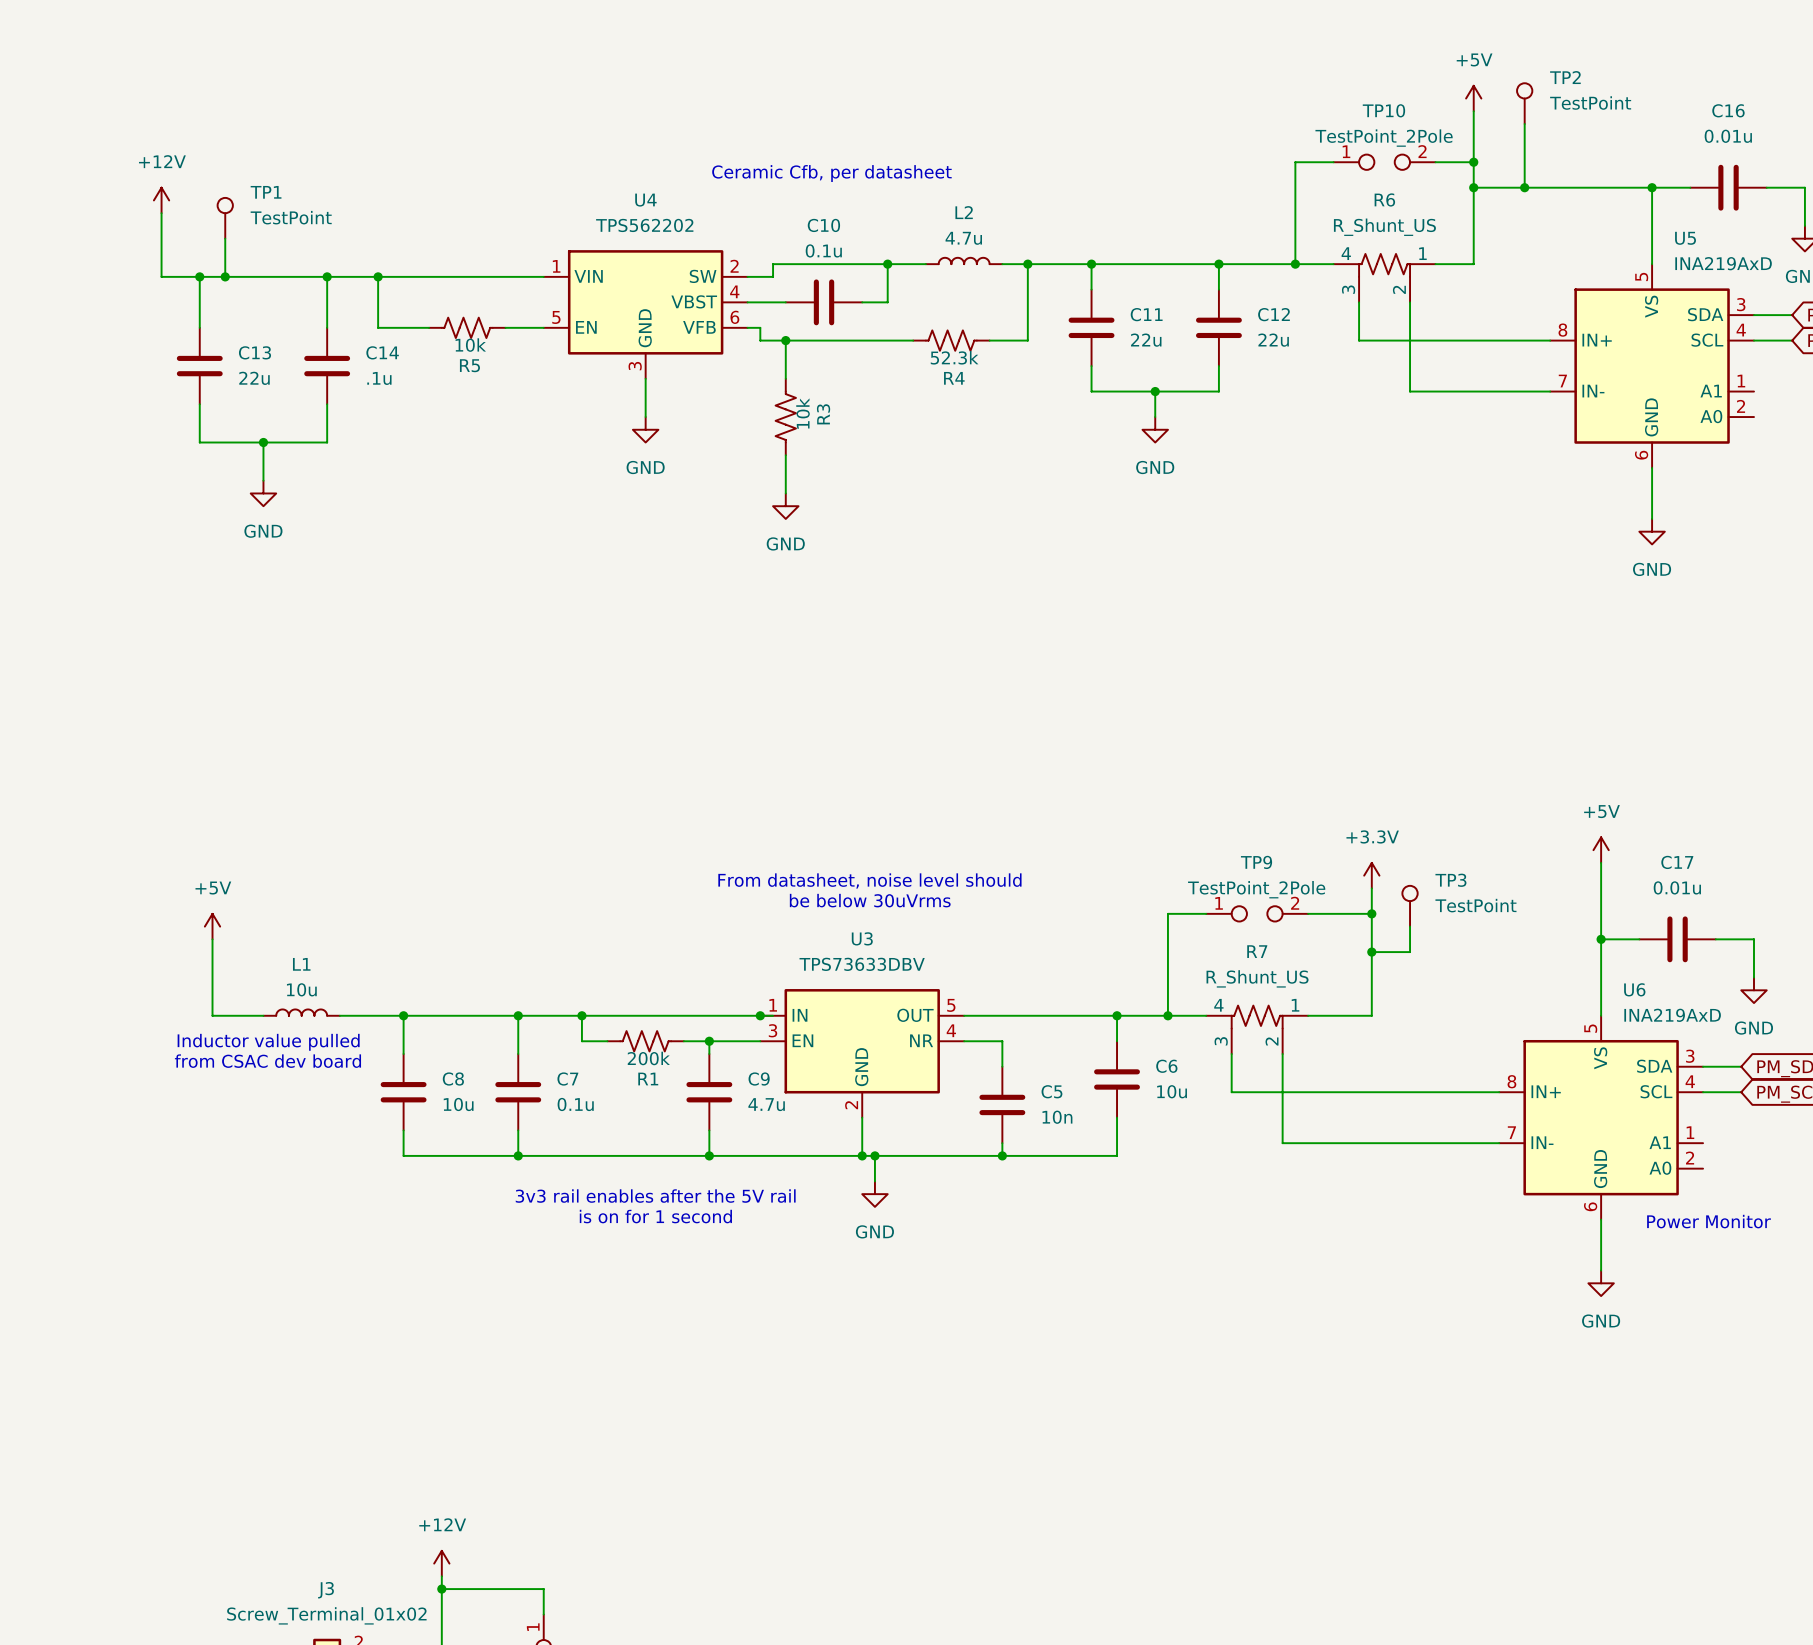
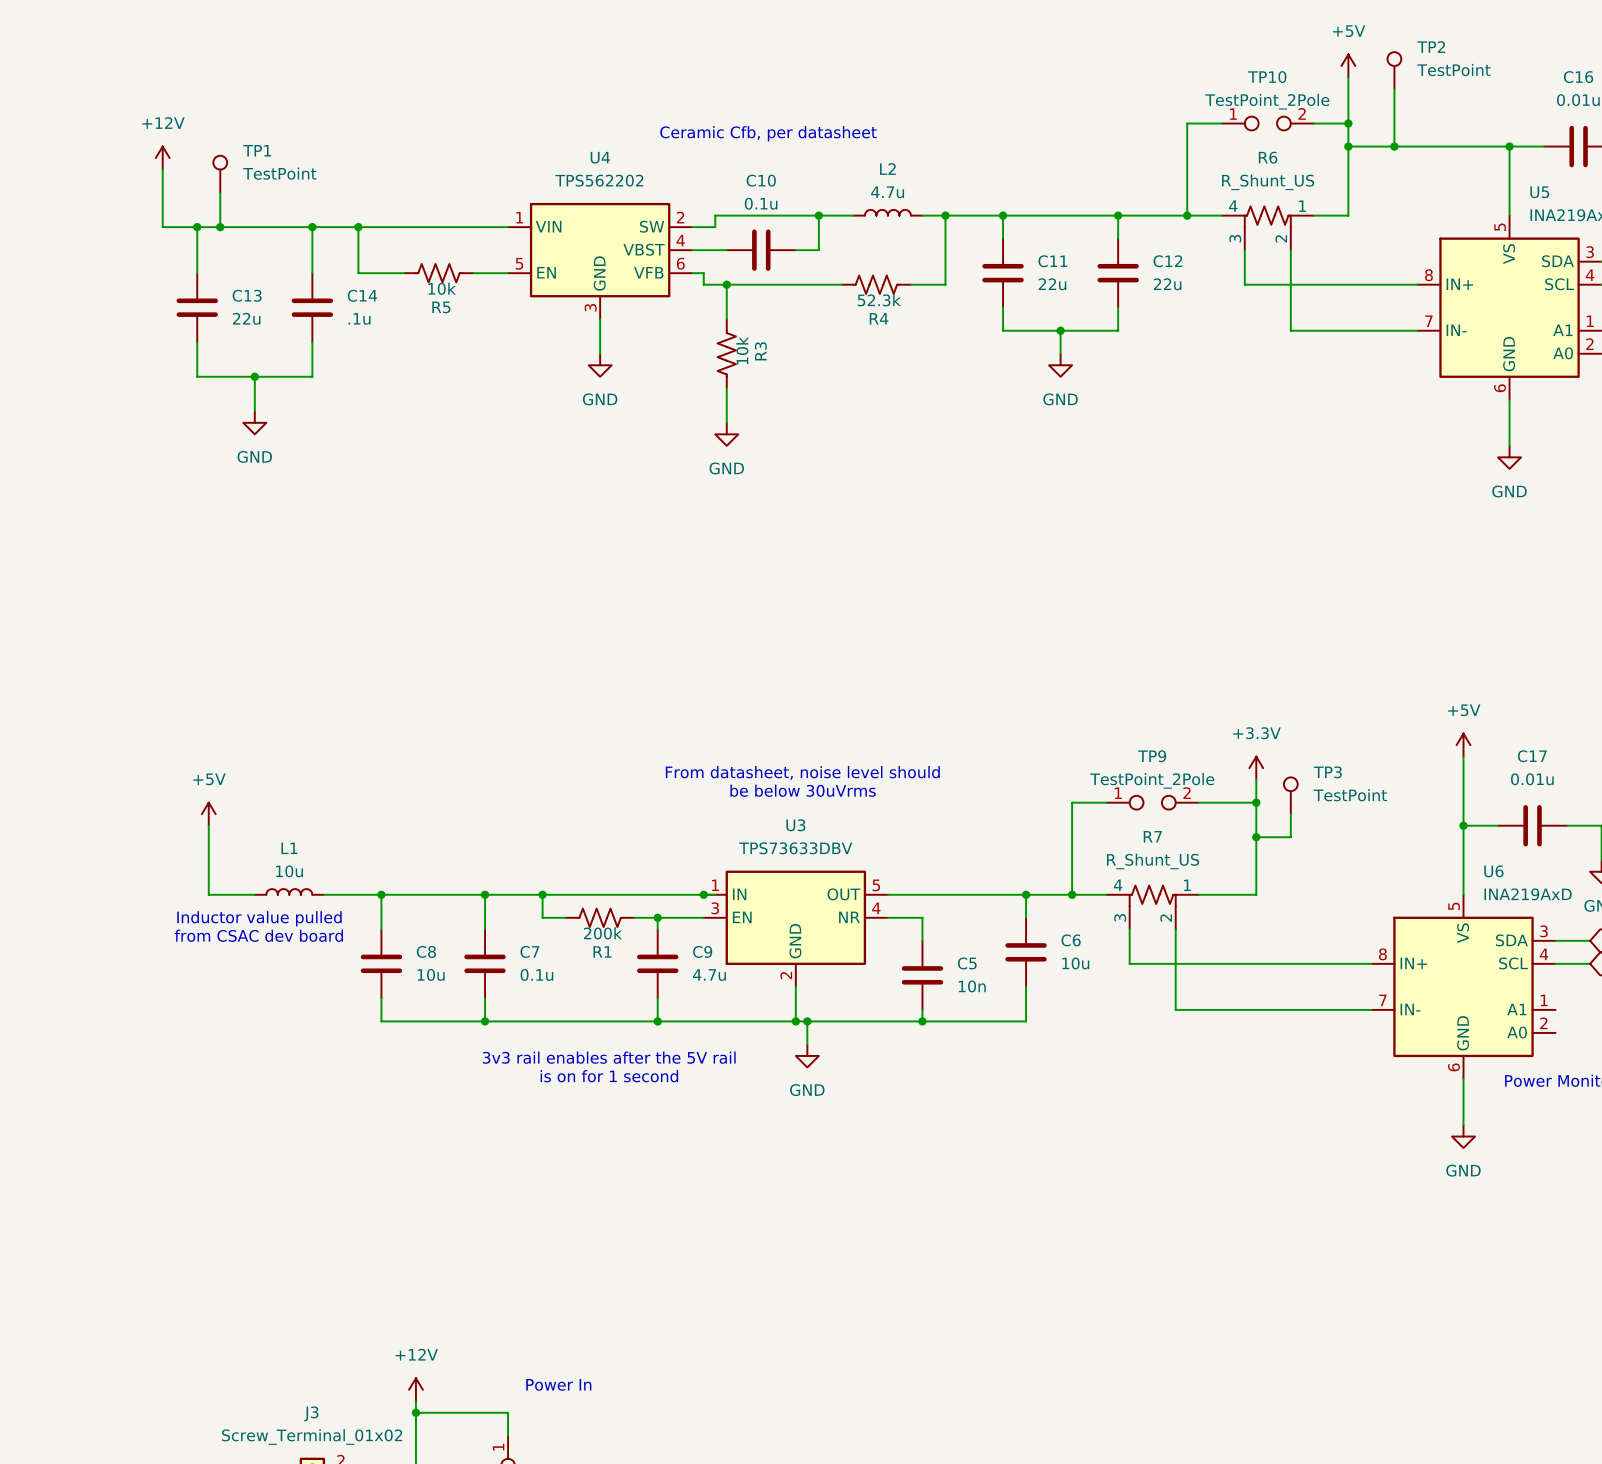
text: none -> Power In (558, 1384)

